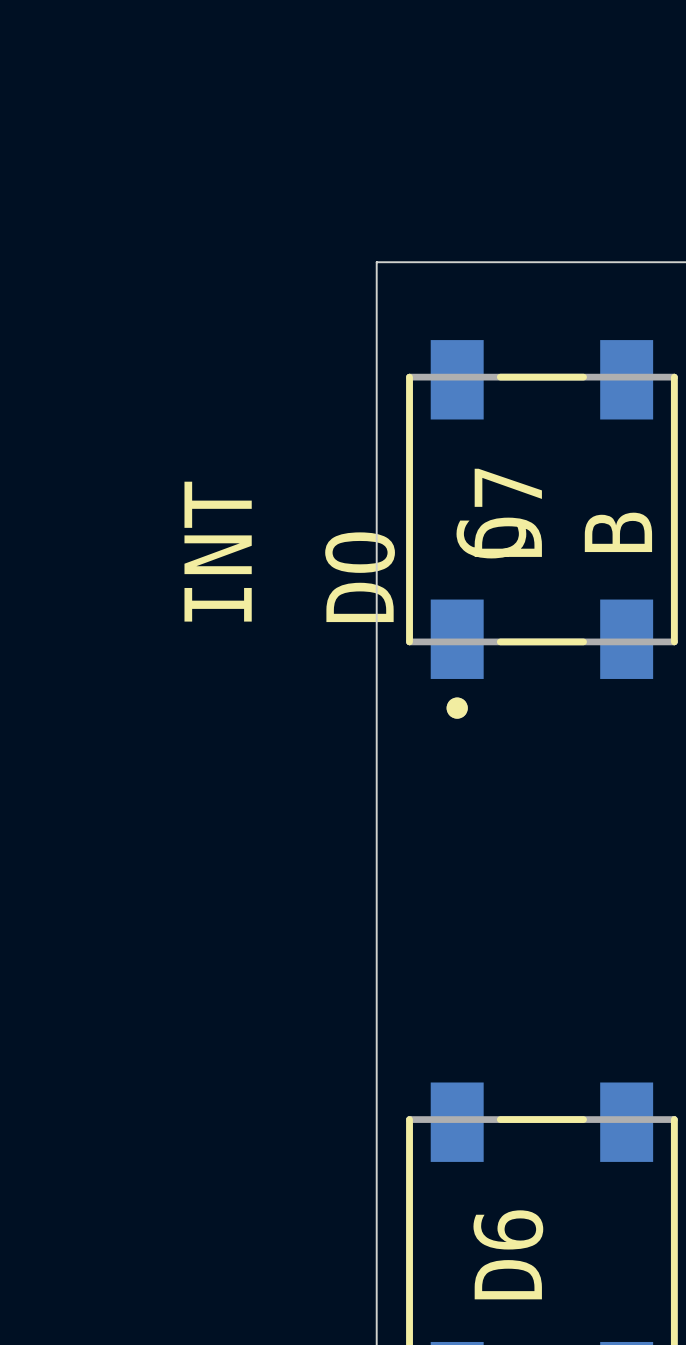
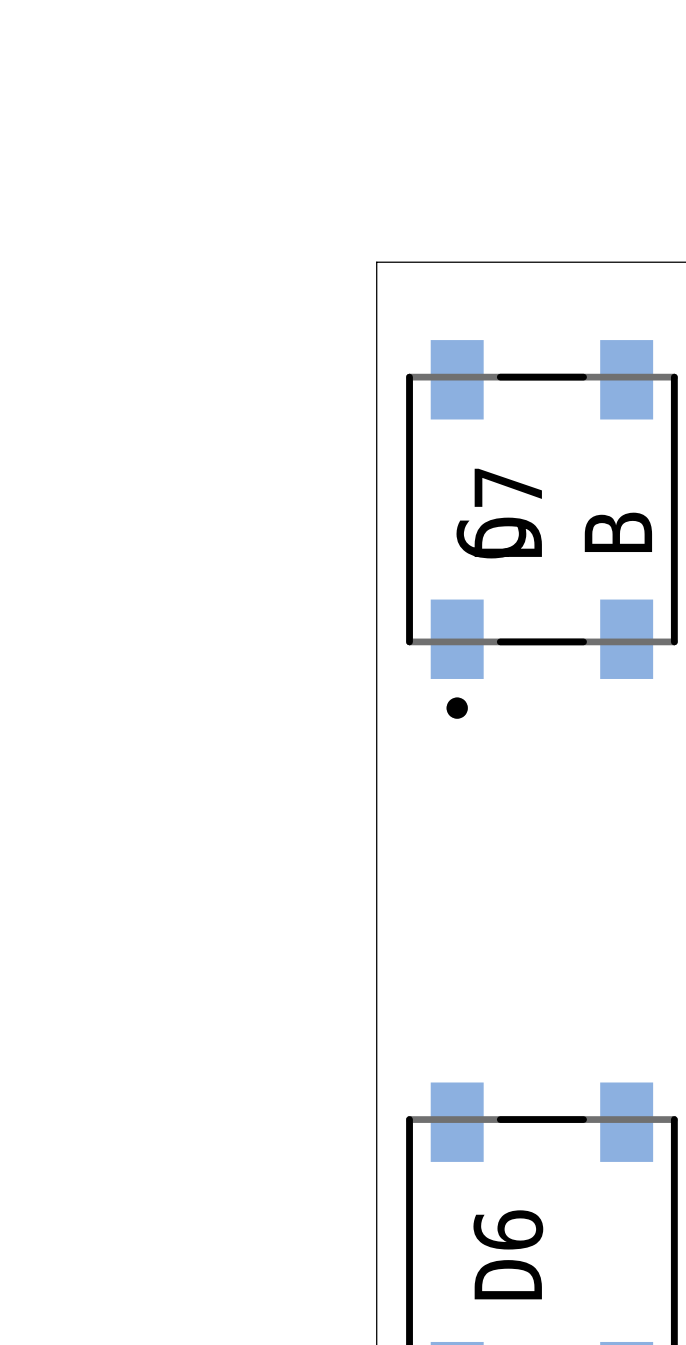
text: INT (218, 551) -> none
text: DO (360, 577) -> none

